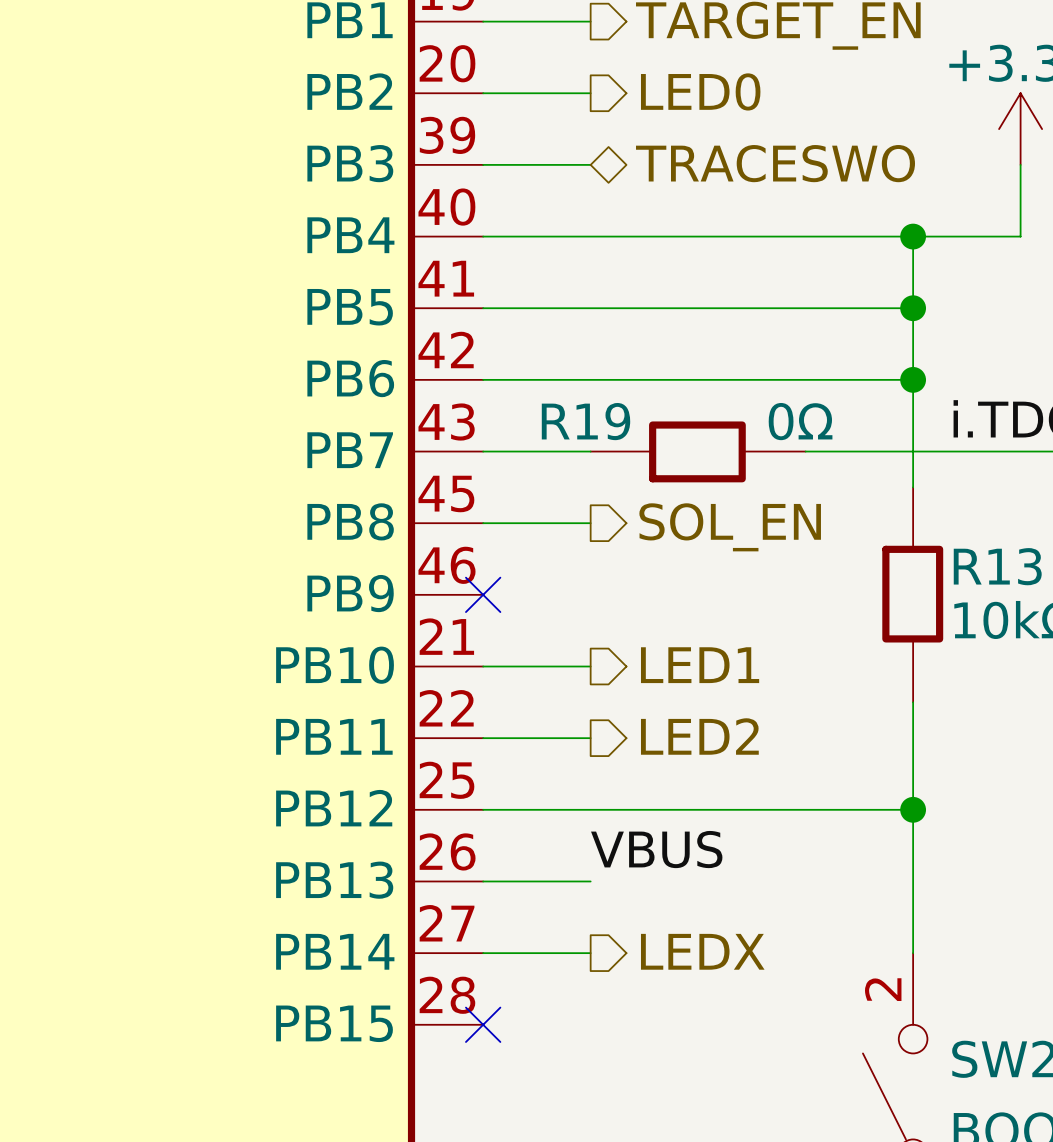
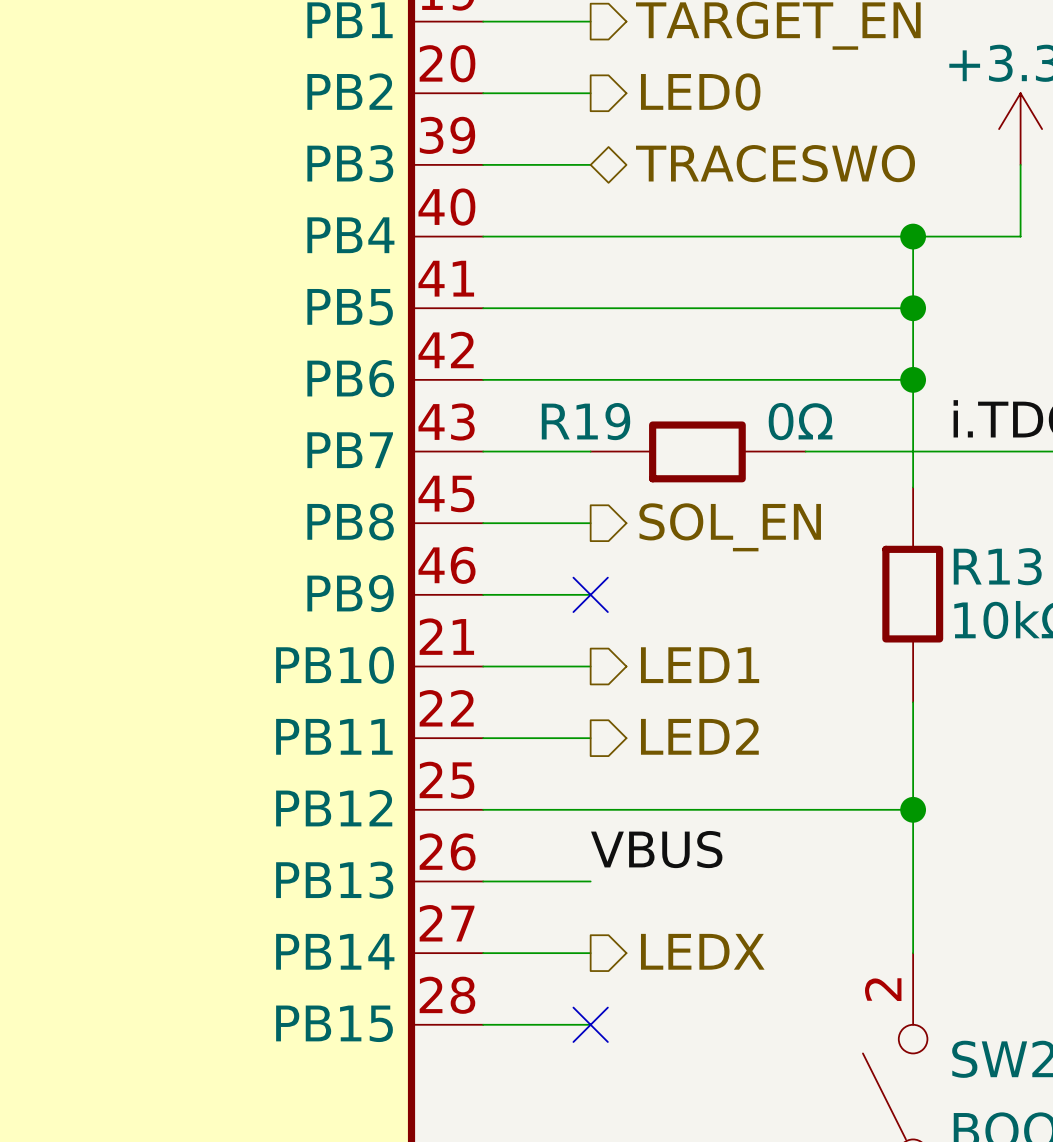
wire: none -> (483, 594) (590, 594)
no-connect mark position: (483, 594) -> (590, 594)
wire: none -> (483, 1024) (590, 1024)
no-connect mark position: (483, 1024) -> (590, 1024)

